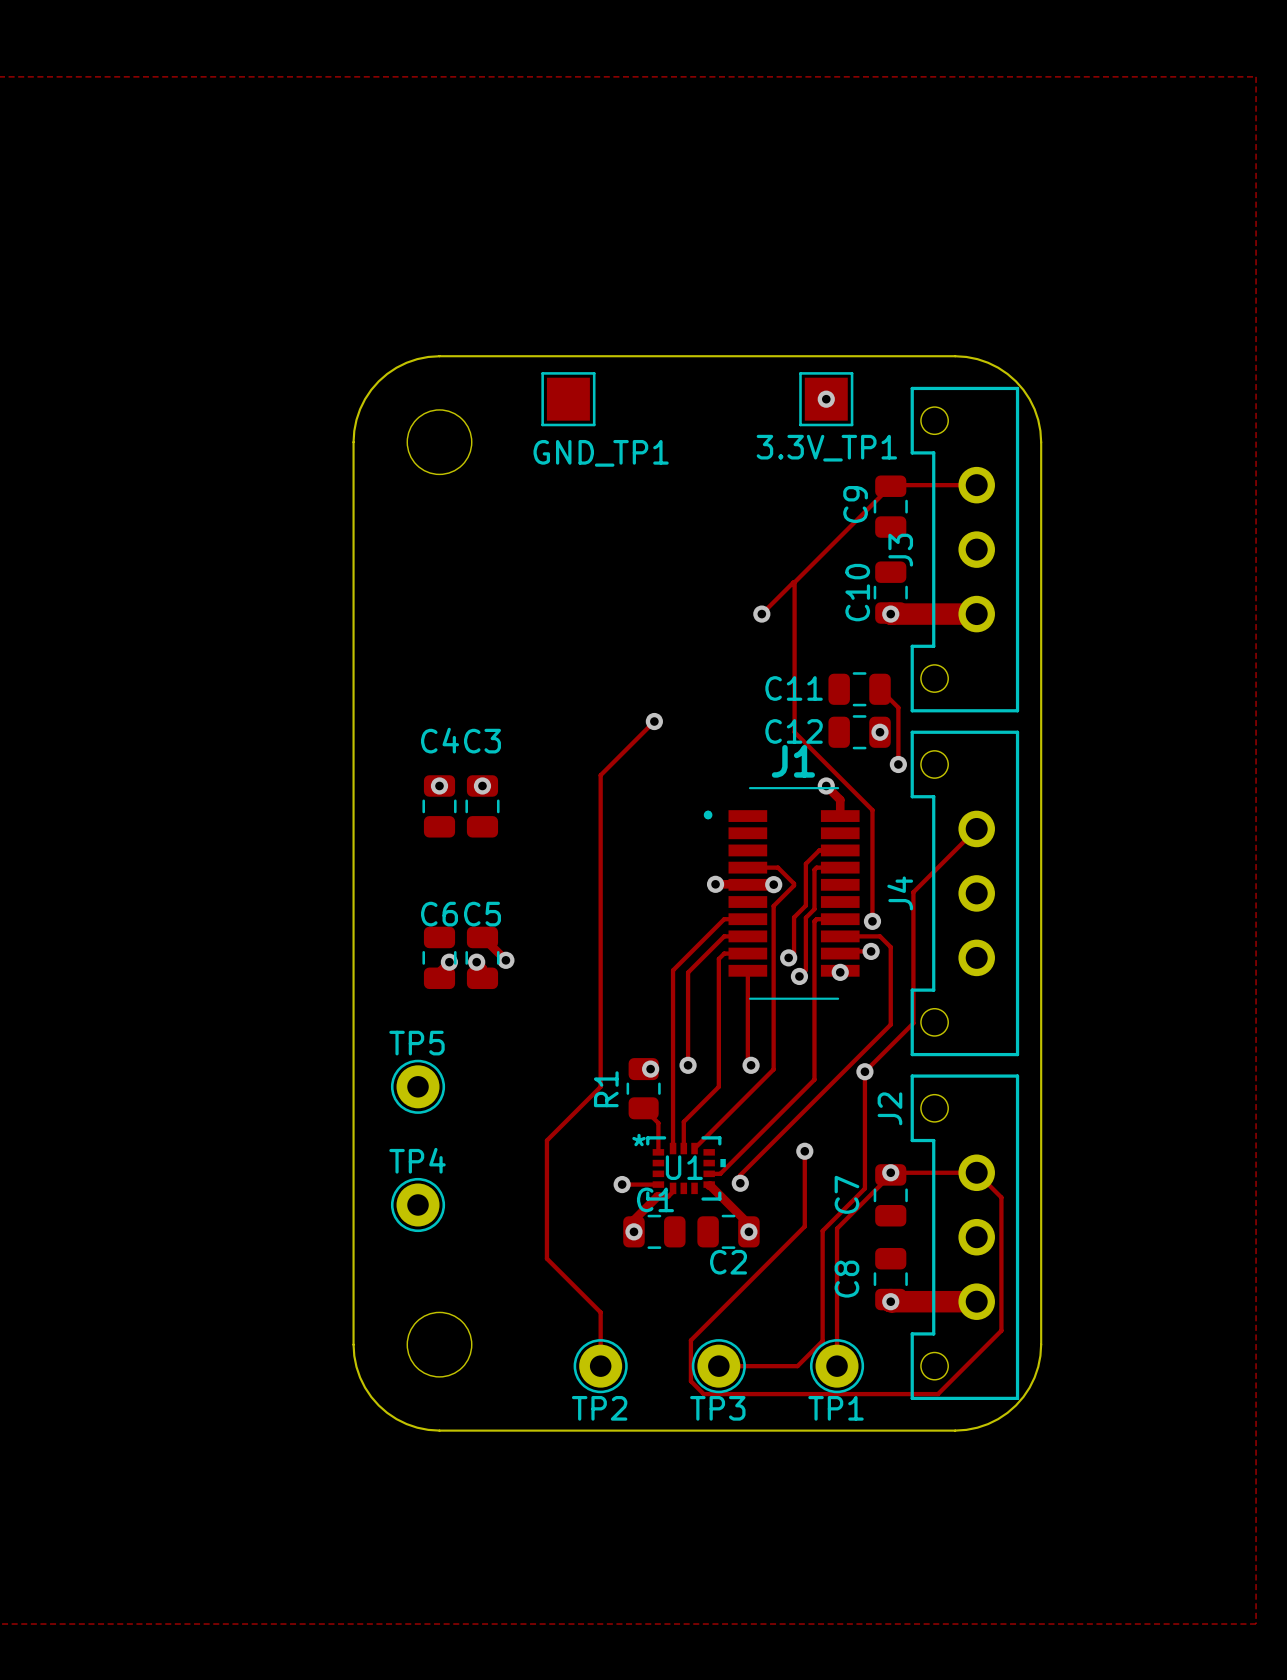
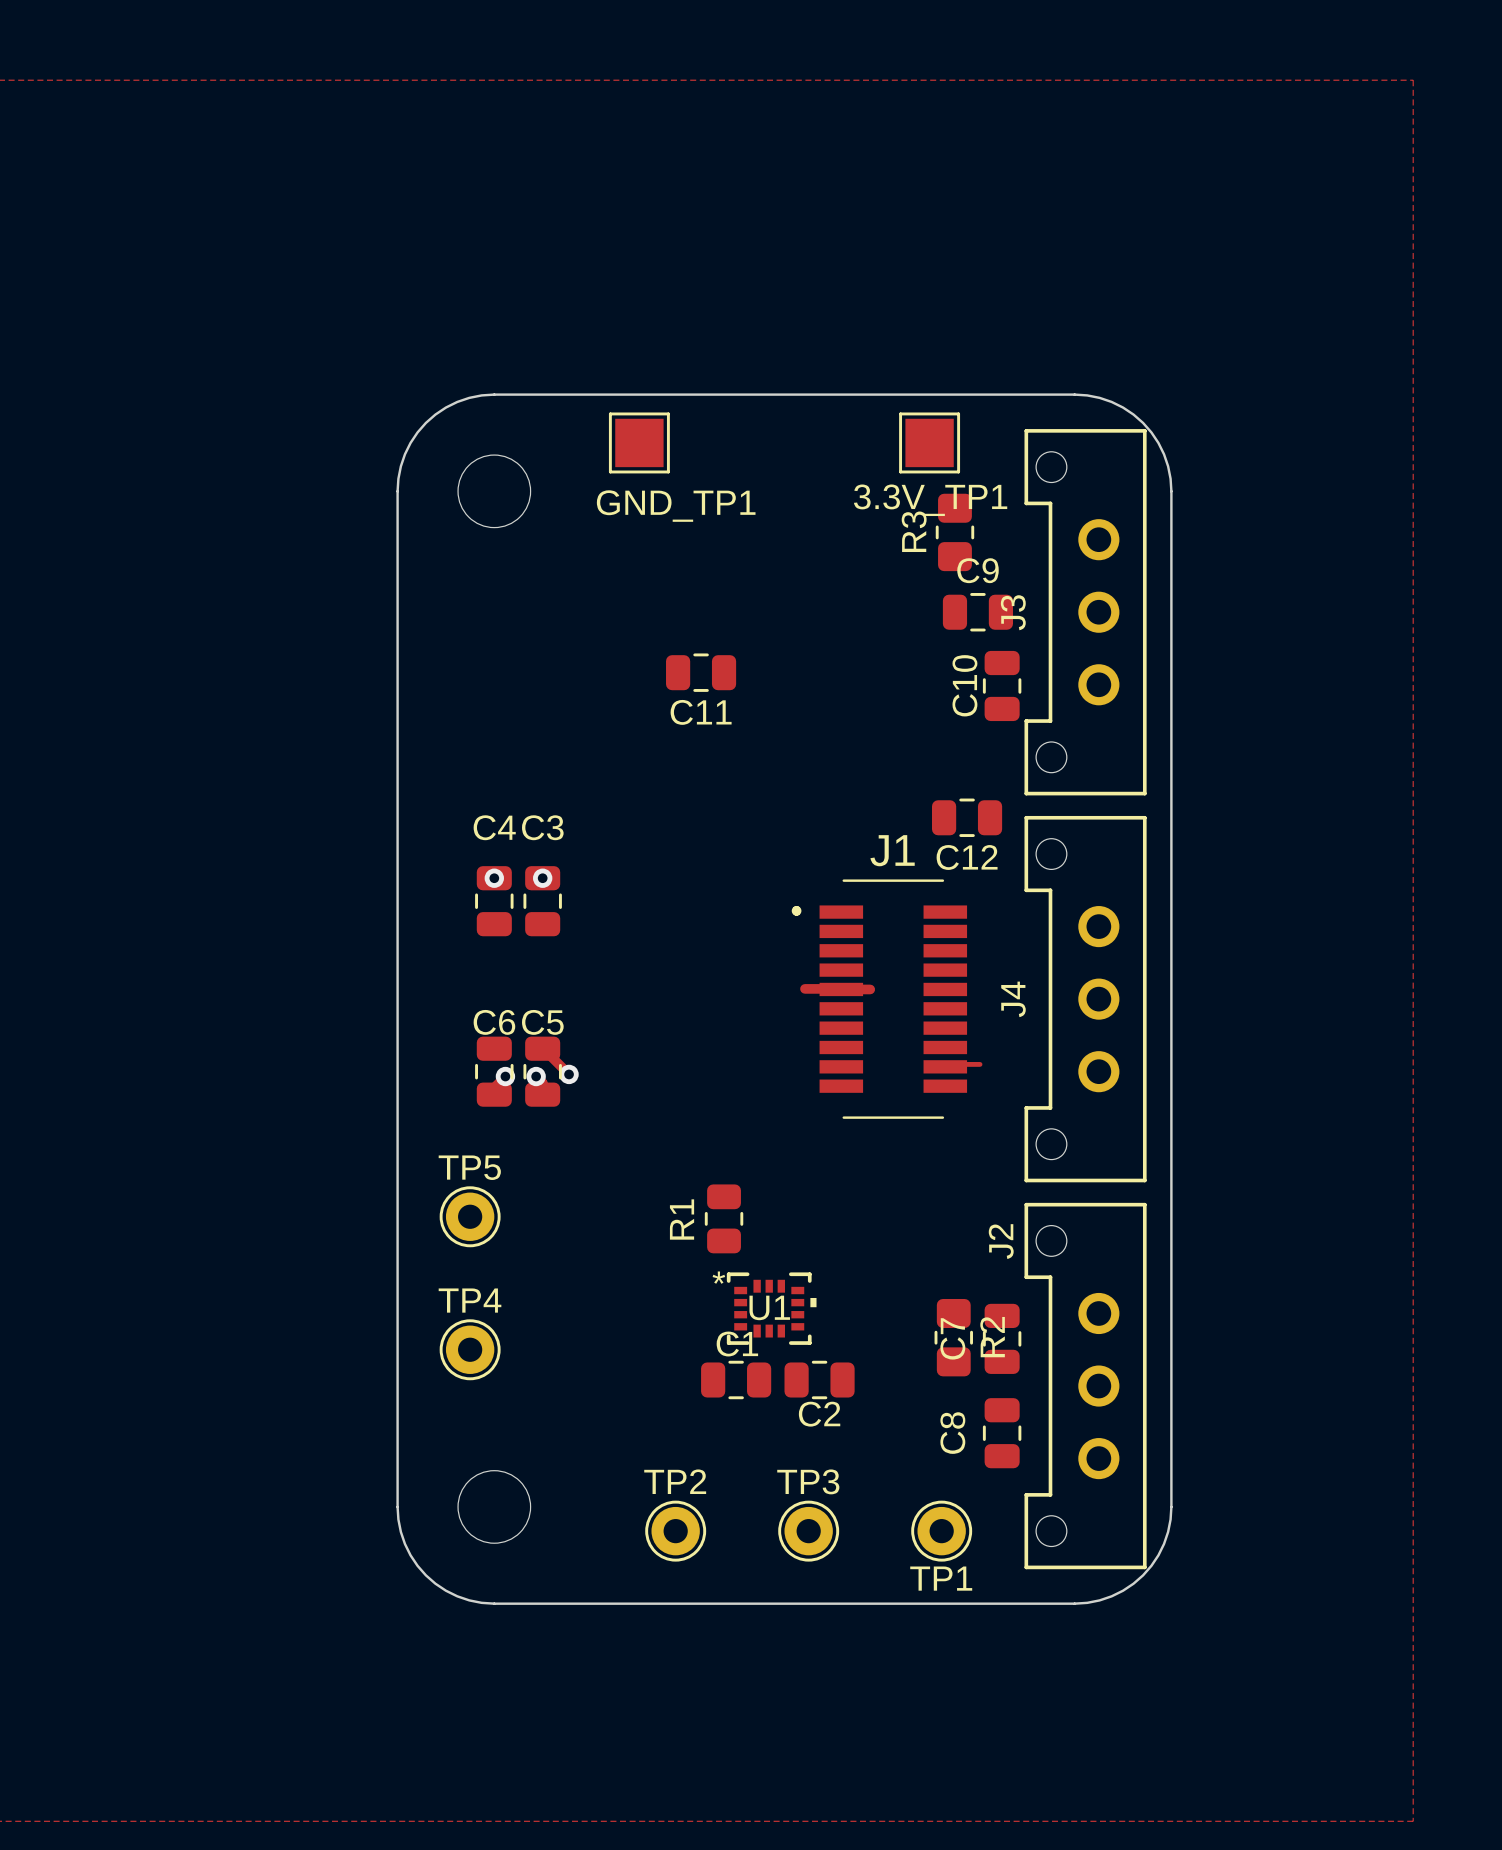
via: (826, 399) -> none
R3: none -> (954, 532)
track: (976, 485) (891, 485) (794, 582) -> none
C9 rotation: 0° (890, 506) -> 90° clockwise (977, 612)
C9 position: (890, 506) -> (977, 612)
track: (794, 582) (794, 732) (872, 810) (872, 921) -> none
track: (794, 582) (761, 614) -> none
C10 position: (890, 592) -> (1002, 685)
track: (890, 613) (976, 614) -> none
via: (761, 614) -> none
via: (890, 614) -> none
C11 name position: C11 (794, 688) -> C11 (701, 712)
C11 position: (859, 689) -> (701, 672)
track: (880, 689) (898, 707) (898, 764) -> none
track: (654, 721) (600, 775) (600, 1086) (546, 1140) (546, 1258) (600, 1312) (600, 1366) -> none
via: (654, 721) -> none
C12 name position: C12 (794, 731) -> C12 (967, 857)
via: (880, 732) -> none
via: (898, 764) -> none
track: (826, 785) (840, 799) (840, 816) -> none
via: (826, 785) -> none
track: (976, 828) (913, 892) (913, 1023) (864, 1071) (864, 1188) (822, 1230) (822, 1341) (797, 1366) (718, 1366) -> none
track: (840, 850) (819, 850) (805, 863) (805, 905) (794, 917) (794, 952) (788, 957) -> none
track: (747, 867) (777, 867) (794, 883) (773, 906) (773, 1069) (694, 1148) -> none
track: (840, 867) (816, 867) (814, 869) (814, 909) (805, 917) (805, 970) (799, 976) -> none
via: (715, 884) -> none
via: (773, 884) -> none
track: (747, 919) (724, 919) (673, 970) (673, 1148) -> none
track: (840, 919) (816, 919) (814, 921) (814, 1079) (720, 1173) (709, 1173) -> none
via: (872, 921) -> none
track: (747, 936) (724, 936) (688, 972) (688, 1065) -> none
track: (840, 936) (880, 936) (890, 947) (890, 1024) (740, 1175) (740, 1183) -> none
via: (871, 951) -> none
track: (747, 953) (724, 953) (718, 958) (718, 1086) (683, 1121) (683, 1148) -> none
via: (788, 957) -> none
track: (747, 970) (747, 1062) (751, 1065) -> none
via: (840, 972) -> none
via: (799, 976) -> none
via: (688, 1065) -> none
via: (751, 1065) -> none
via: (650, 1069) -> none
via: (864, 1071) -> none
track: (643, 1108) (658, 1123) (658, 1152) -> none
track: (804, 1151) (804, 1226) (690, 1340) (690, 1381) (703, 1394) (938, 1394) (1001, 1330) (1001, 1197) (976, 1172) (892, 1172) (837, 1228) (837, 1366) -> none
via: (804, 1151) -> none
via: (890, 1172) -> none
via: (740, 1183) -> none
track: (622, 1184) (658, 1184) -> none
via: (622, 1184) -> none
track: (709, 1185) (748, 1224) (748, 1231) (744, 1227) -> none
track: (673, 1188) (673, 1191) (668, 1196) (657, 1196) (633, 1220) (633, 1231) -> none
R2: none -> (953, 1337)
via: (633, 1231) -> none
via: (748, 1231) -> none
track: (890, 1299) (890, 1301) (976, 1301) -> none
via: (890, 1301) -> none
TP2 name position: TP2 (599, 1408) -> TP2 (675, 1481)
TP3 name position: TP3 (717, 1408) -> TP3 (808, 1481)

